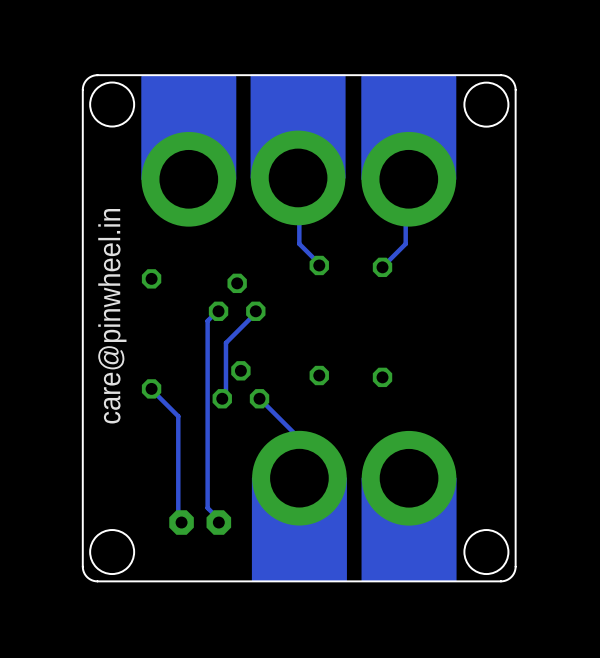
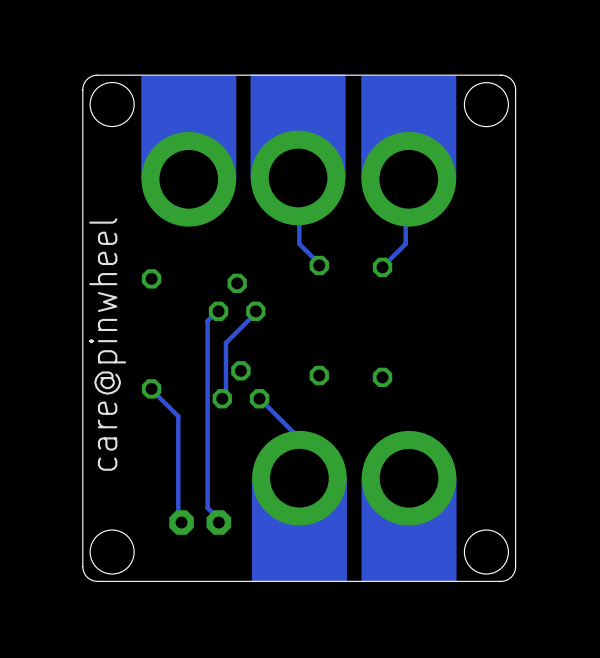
text: care@pinwheel.in (112, 316) -> care@pinwheel (107, 344)

